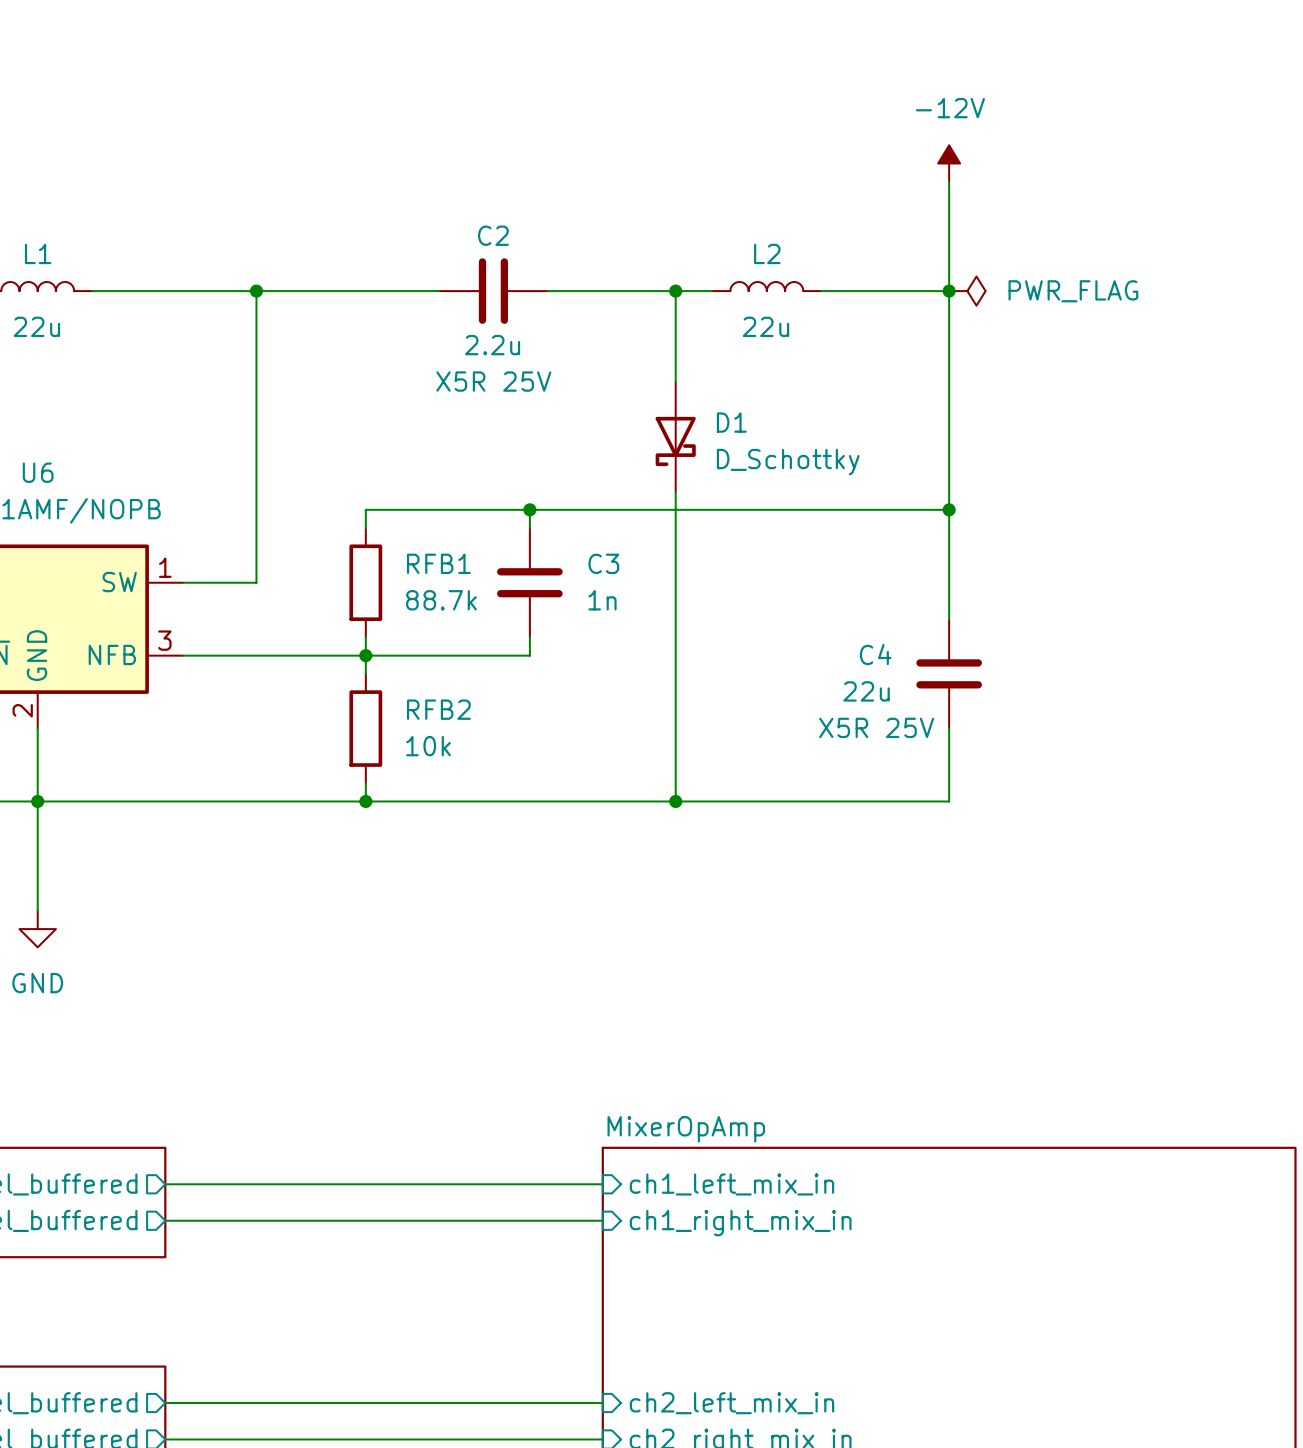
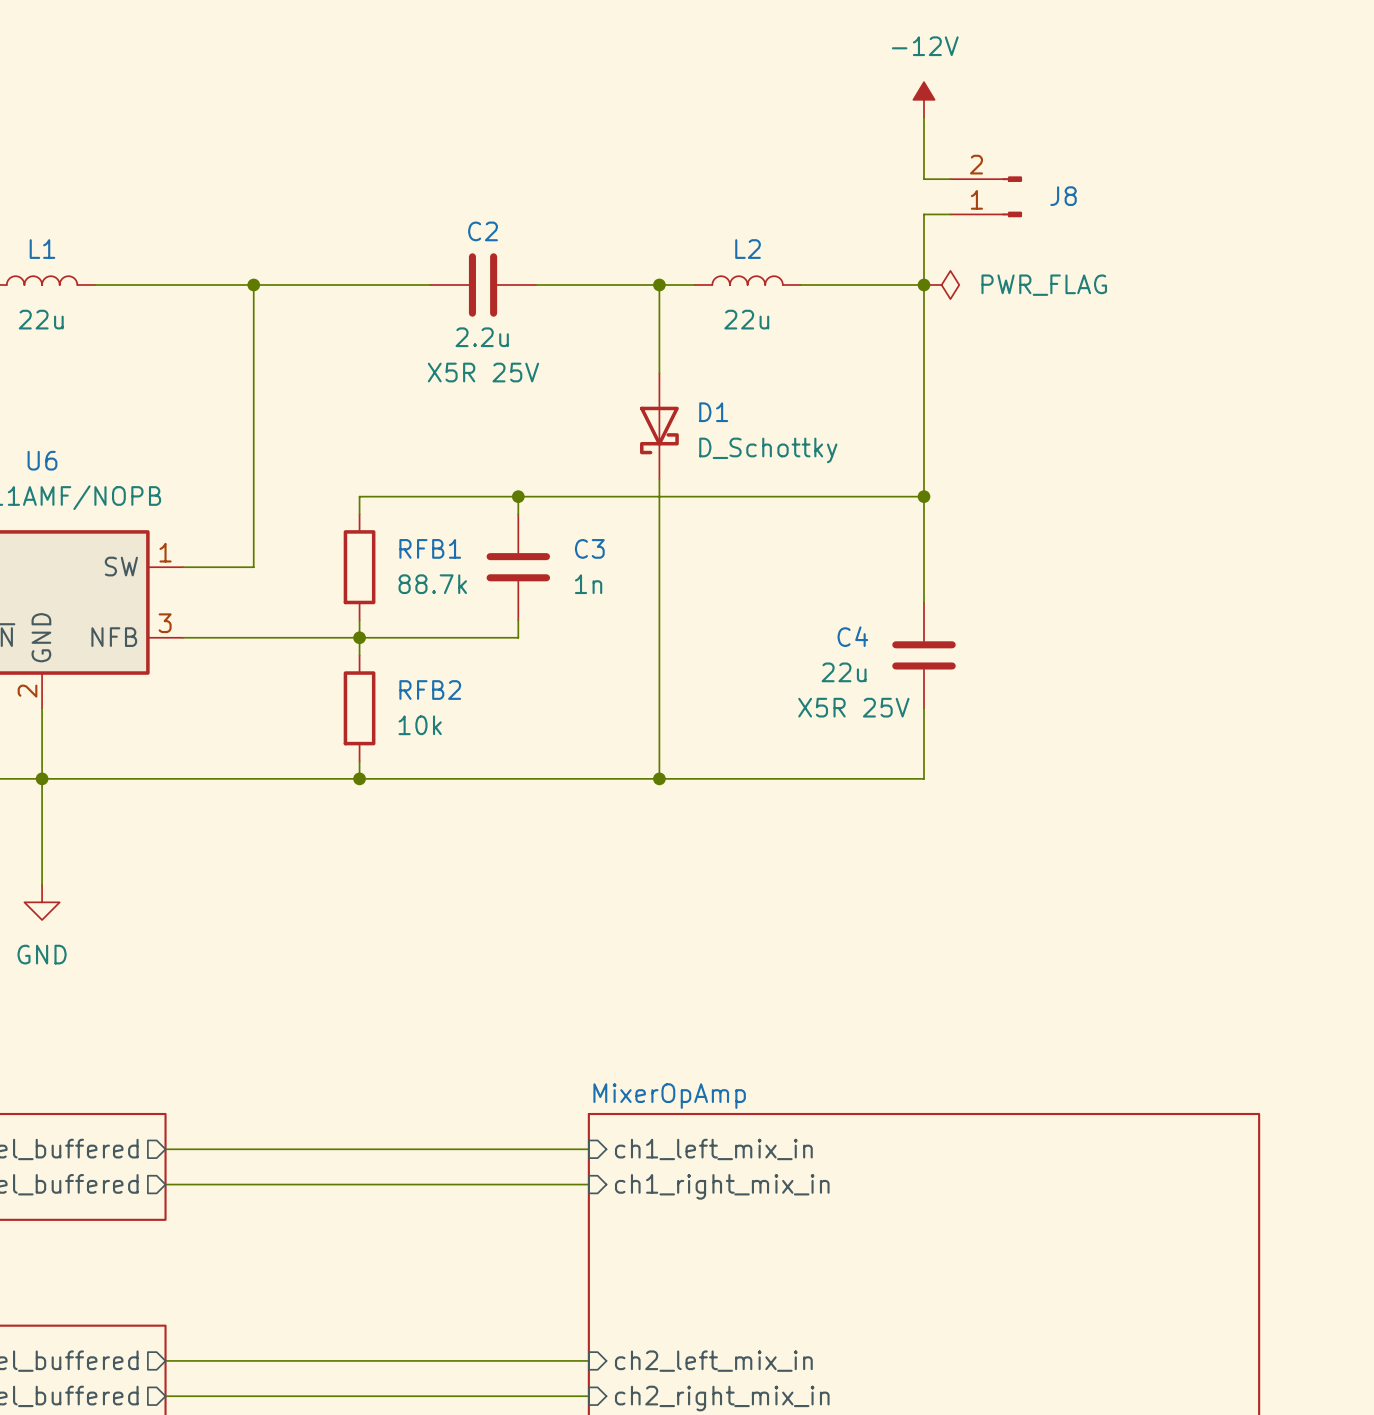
wire: none -> (924, 117) (924, 179) (950, 179)
power symbol position: -12V (949, 163) -> -12V (924, 99)
wire: (949, 181) (949, 218) -> (950, 214) (924, 214)
J8: none -> (986, 196)

